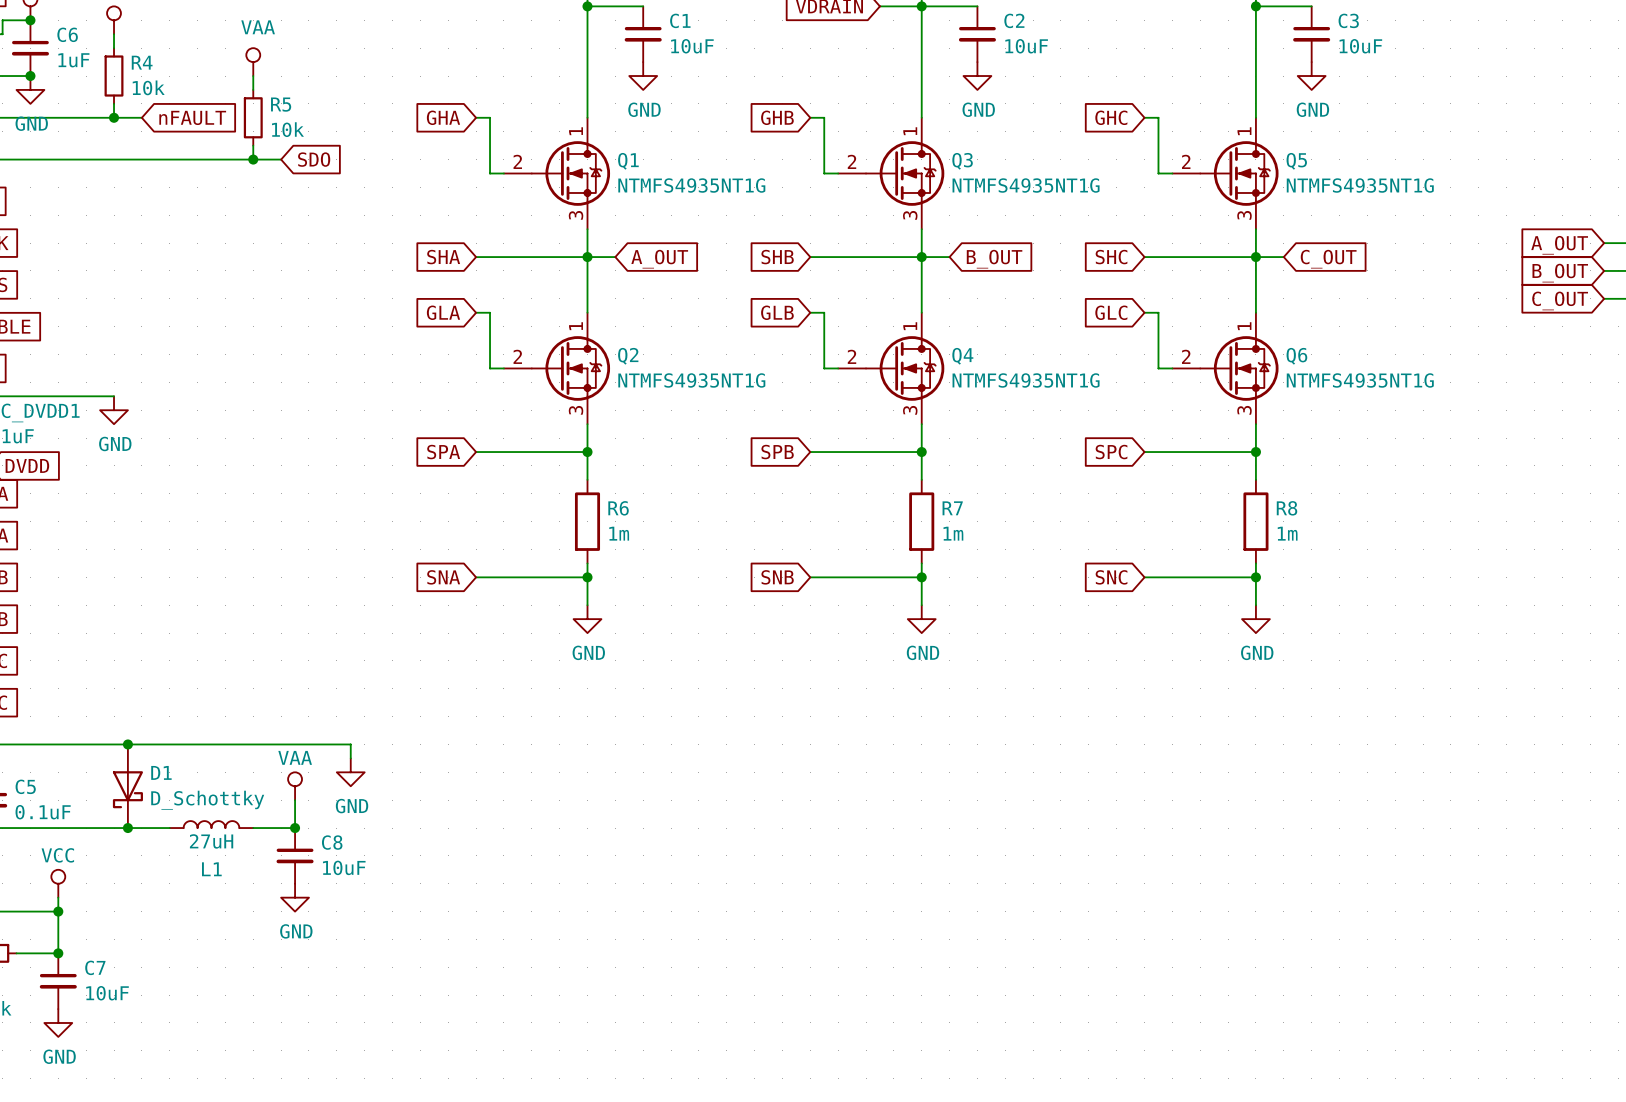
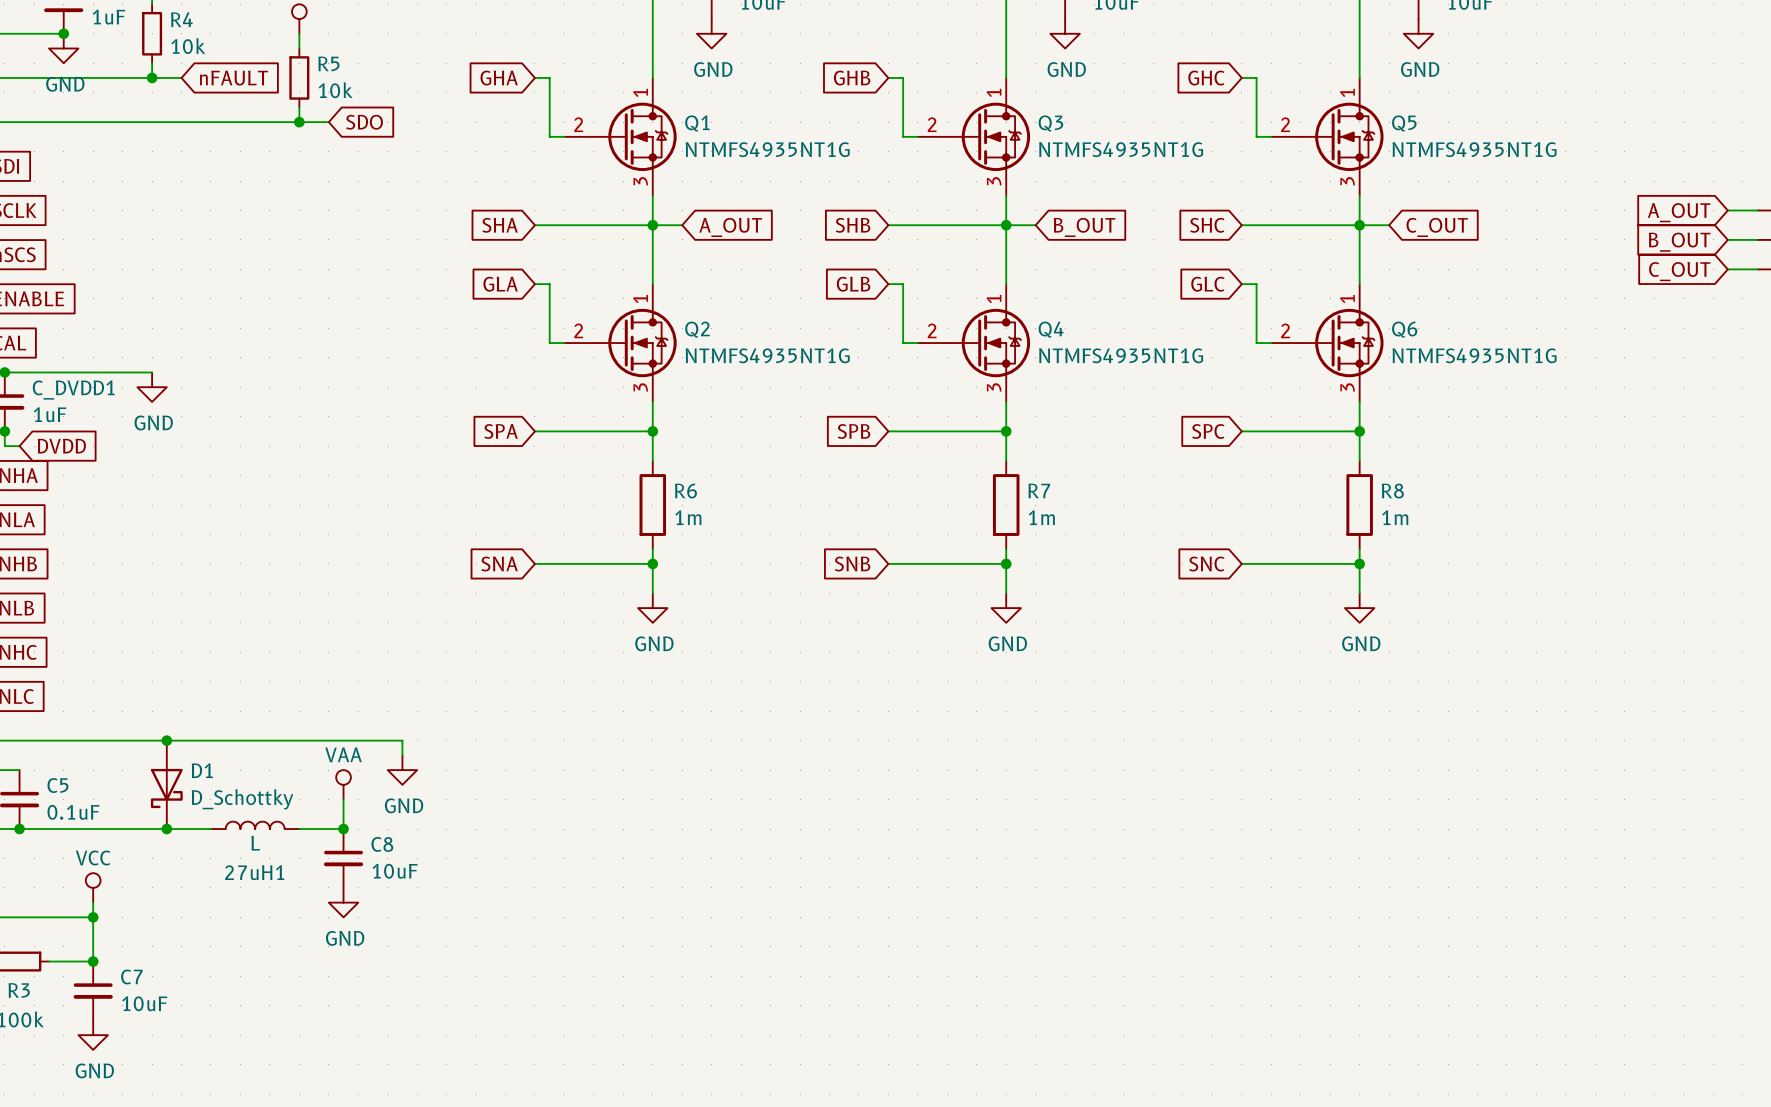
L1 value: 27uH (211, 841) -> L (255, 843)
L1 name: L1 (211, 869) -> 27uH1 (254, 872)

